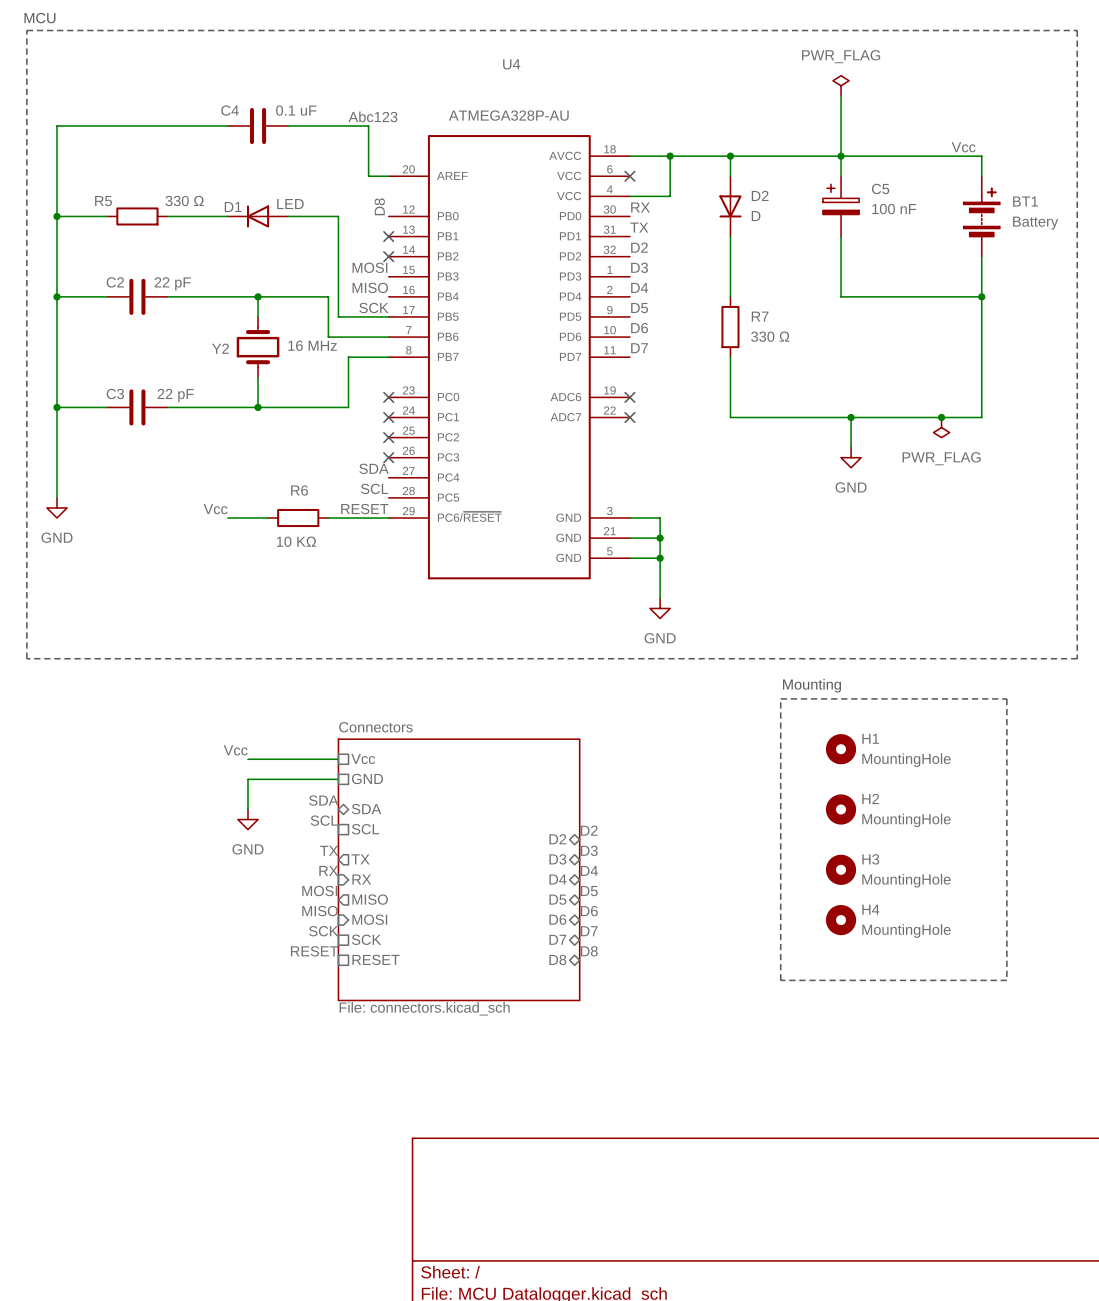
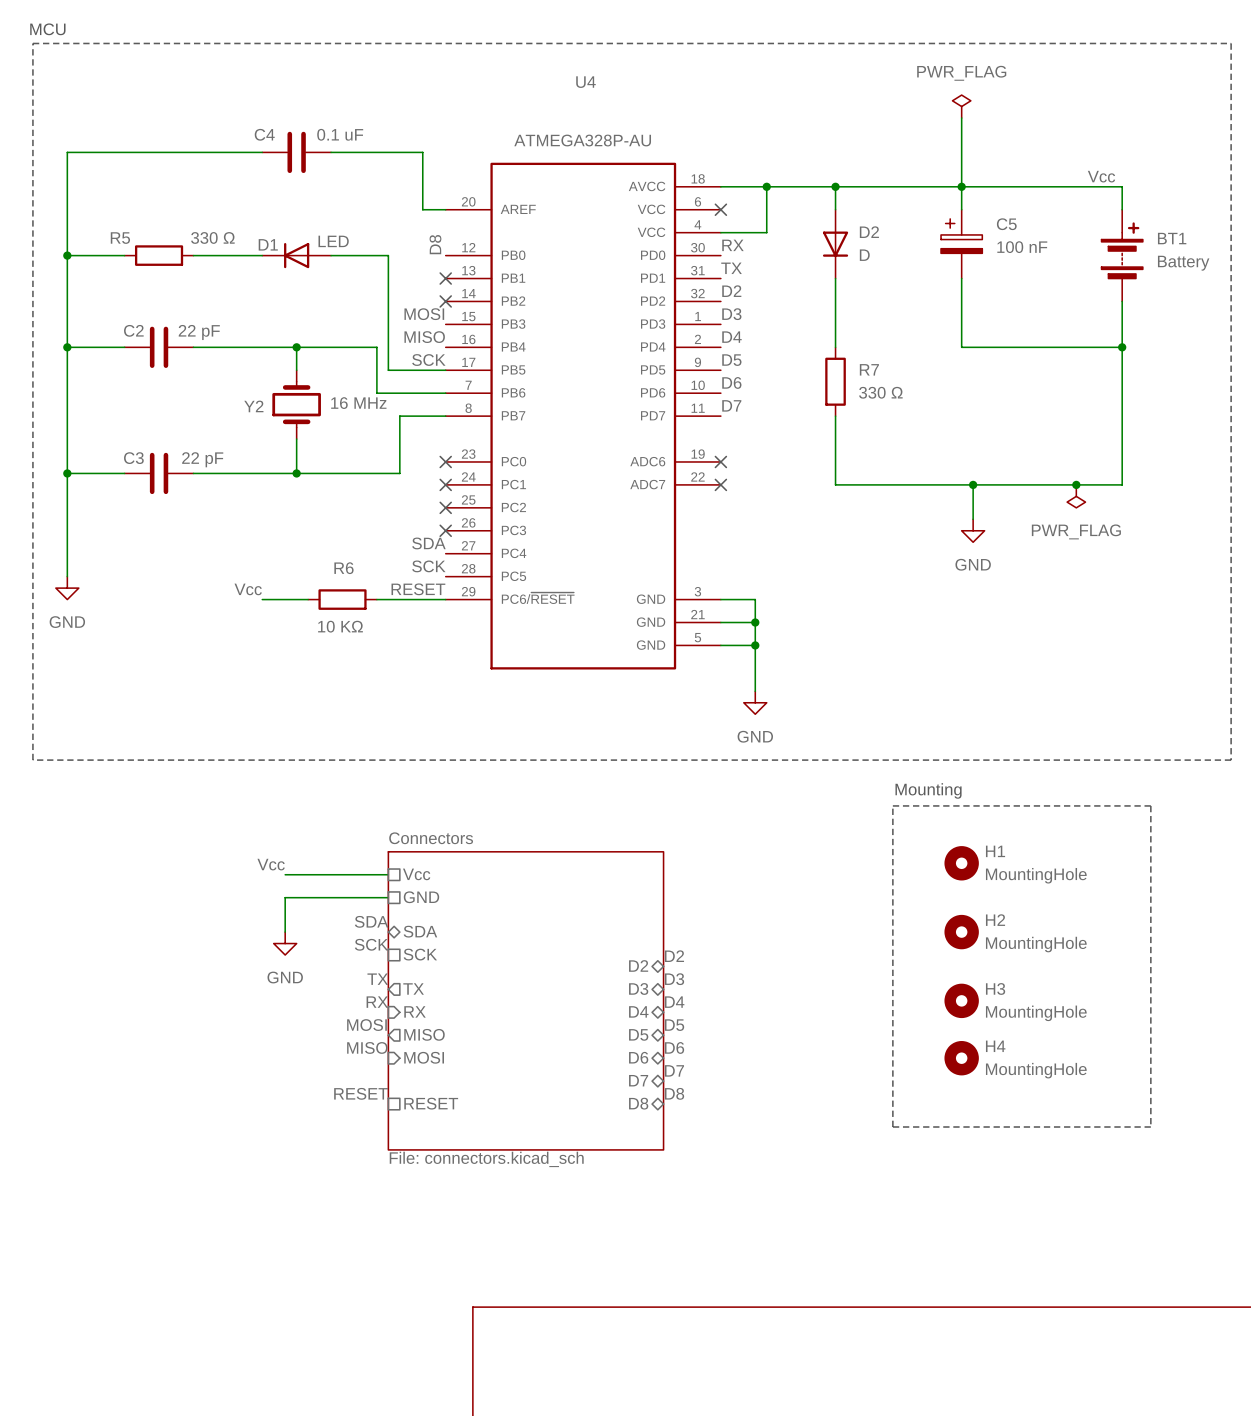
label: Abc123 (372, 116) -> none
label: SCL (374, 488) -> SCK (428, 566)
label: SCL (324, 820) -> SCK (371, 944)
sheet pin: SCL (365, 829) -> SCK (420, 954)
label: SCK (323, 931) -> none
sheet pin: SCK (366, 939) -> none

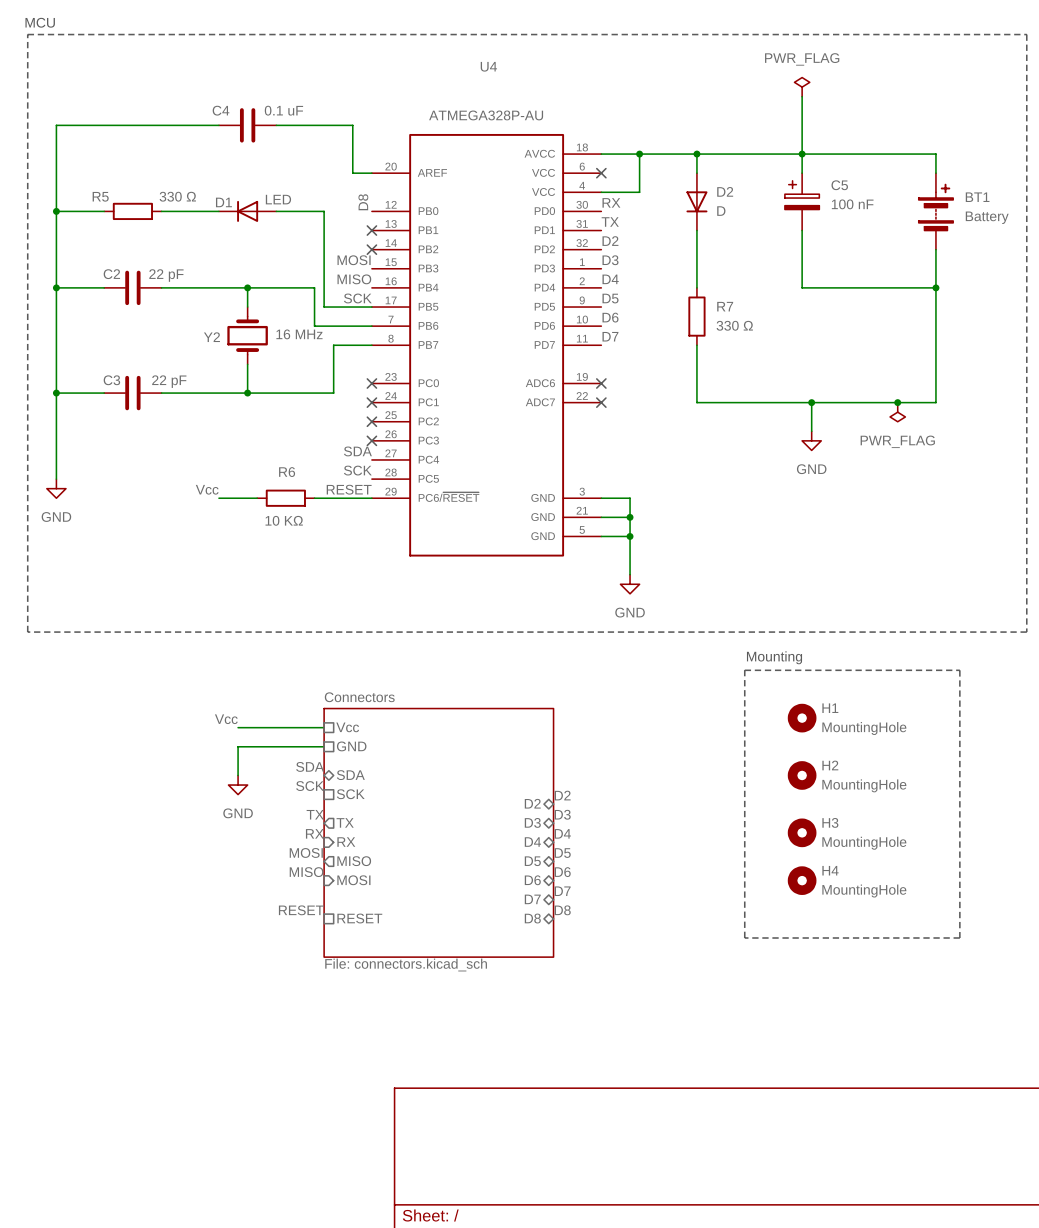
label: Vcc (1101, 176) -> none

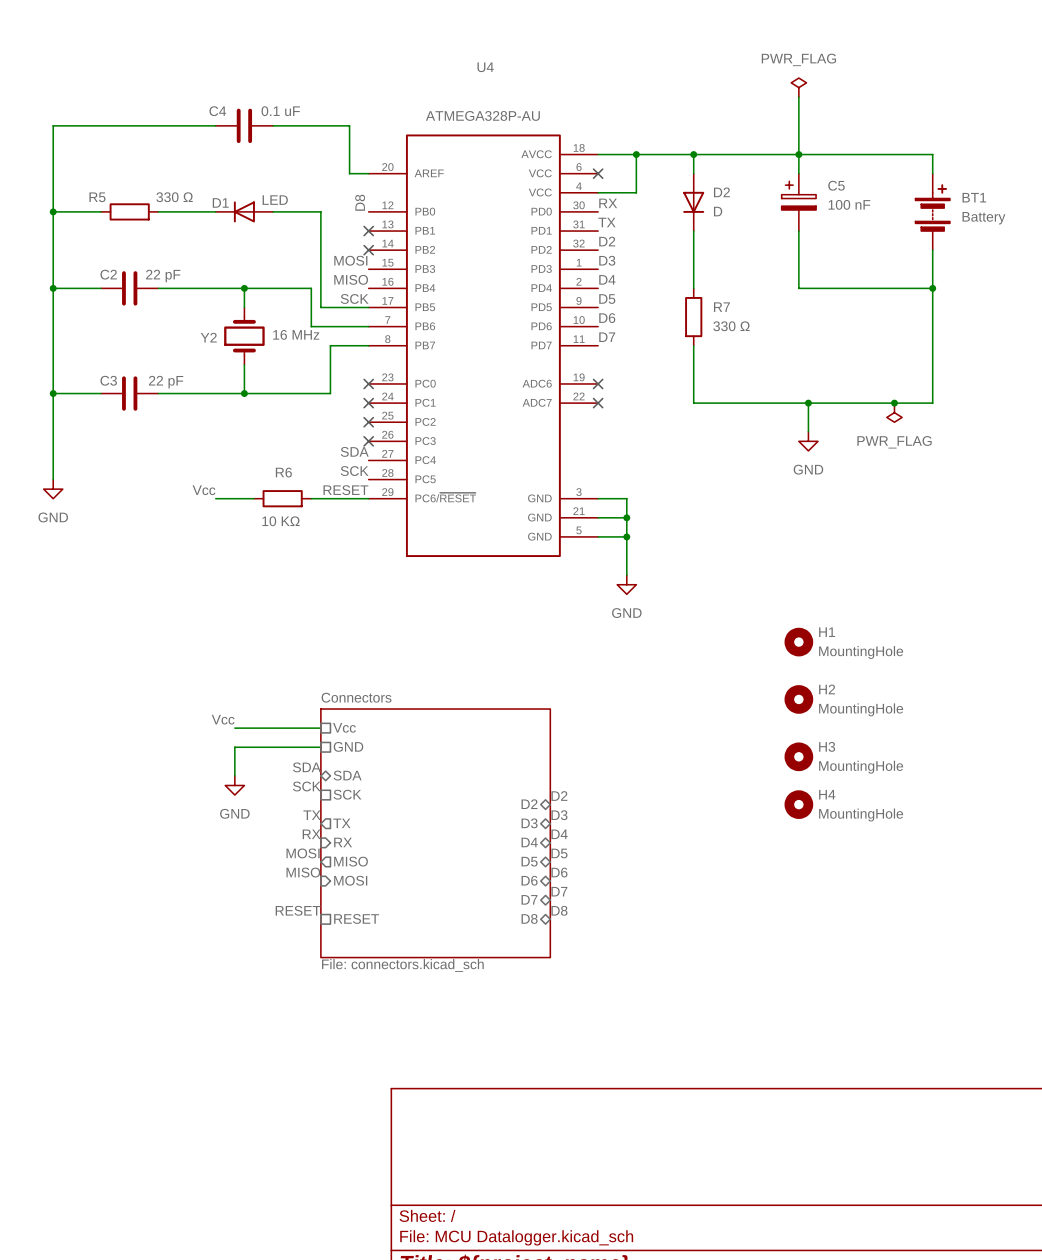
text: MCU (40, 22) -> none
line: (27, 34) (1026, 34) (1026, 632) (27, 632) (27, 34) -> none
text: Mounting (774, 657) -> none
line: (744, 670) (959, 670) (959, 938) (744, 938) (744, 670) -> none
H1 position: (802, 718) -> (798, 642)
H2 position: (802, 775) -> (798, 699)
H3 position: (802, 832) -> (798, 756)
H4 position: (802, 880) -> (798, 804)

